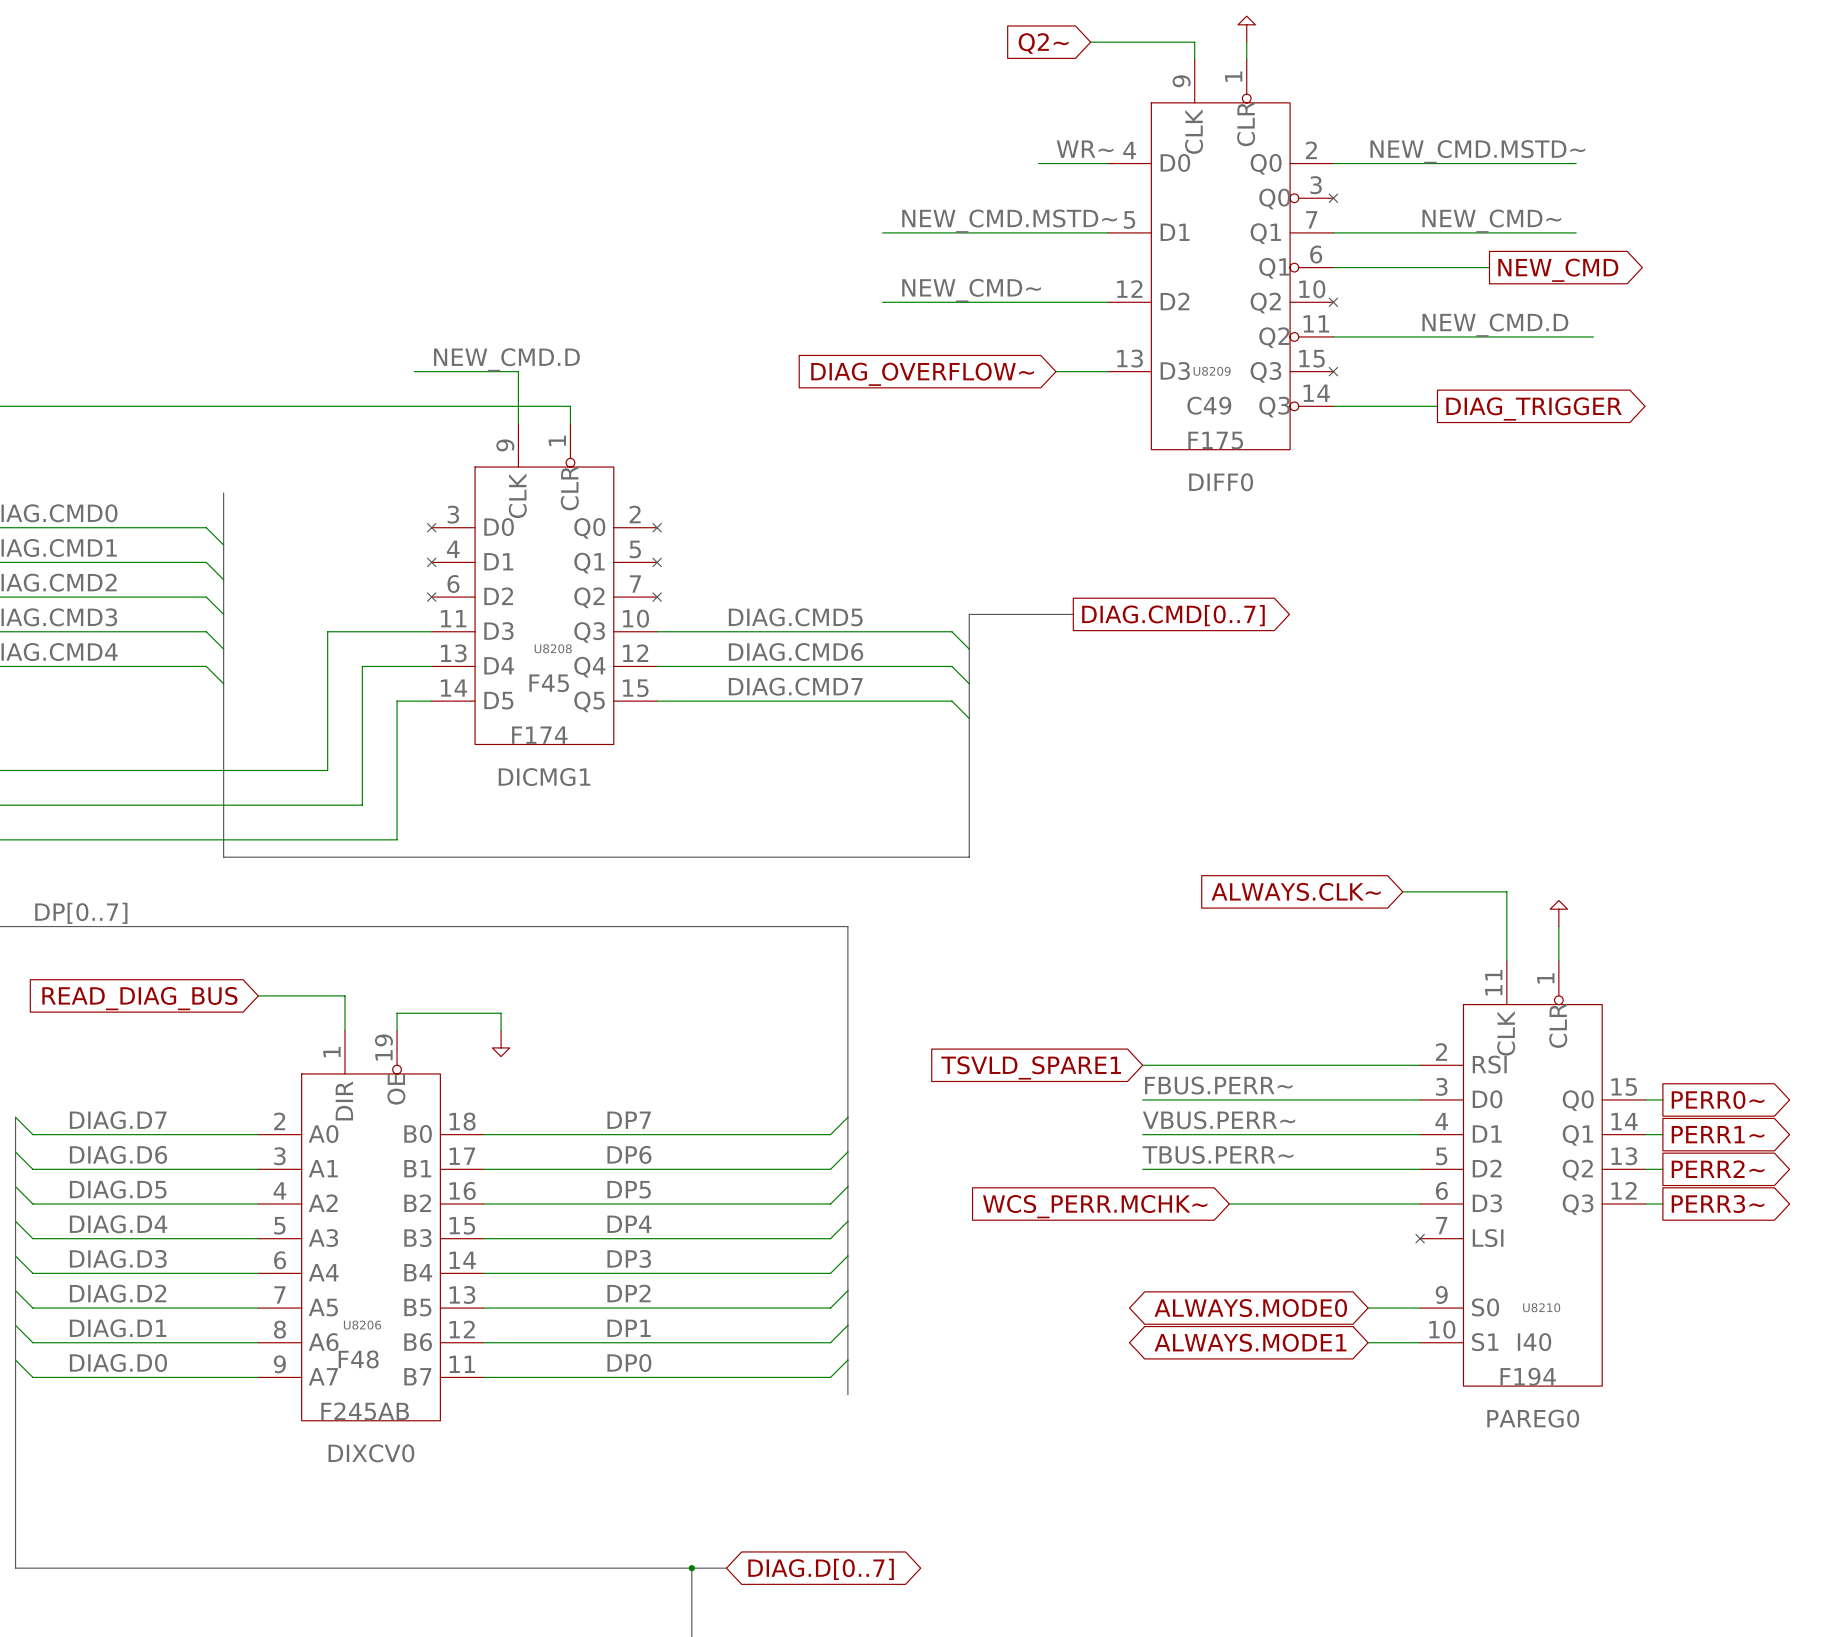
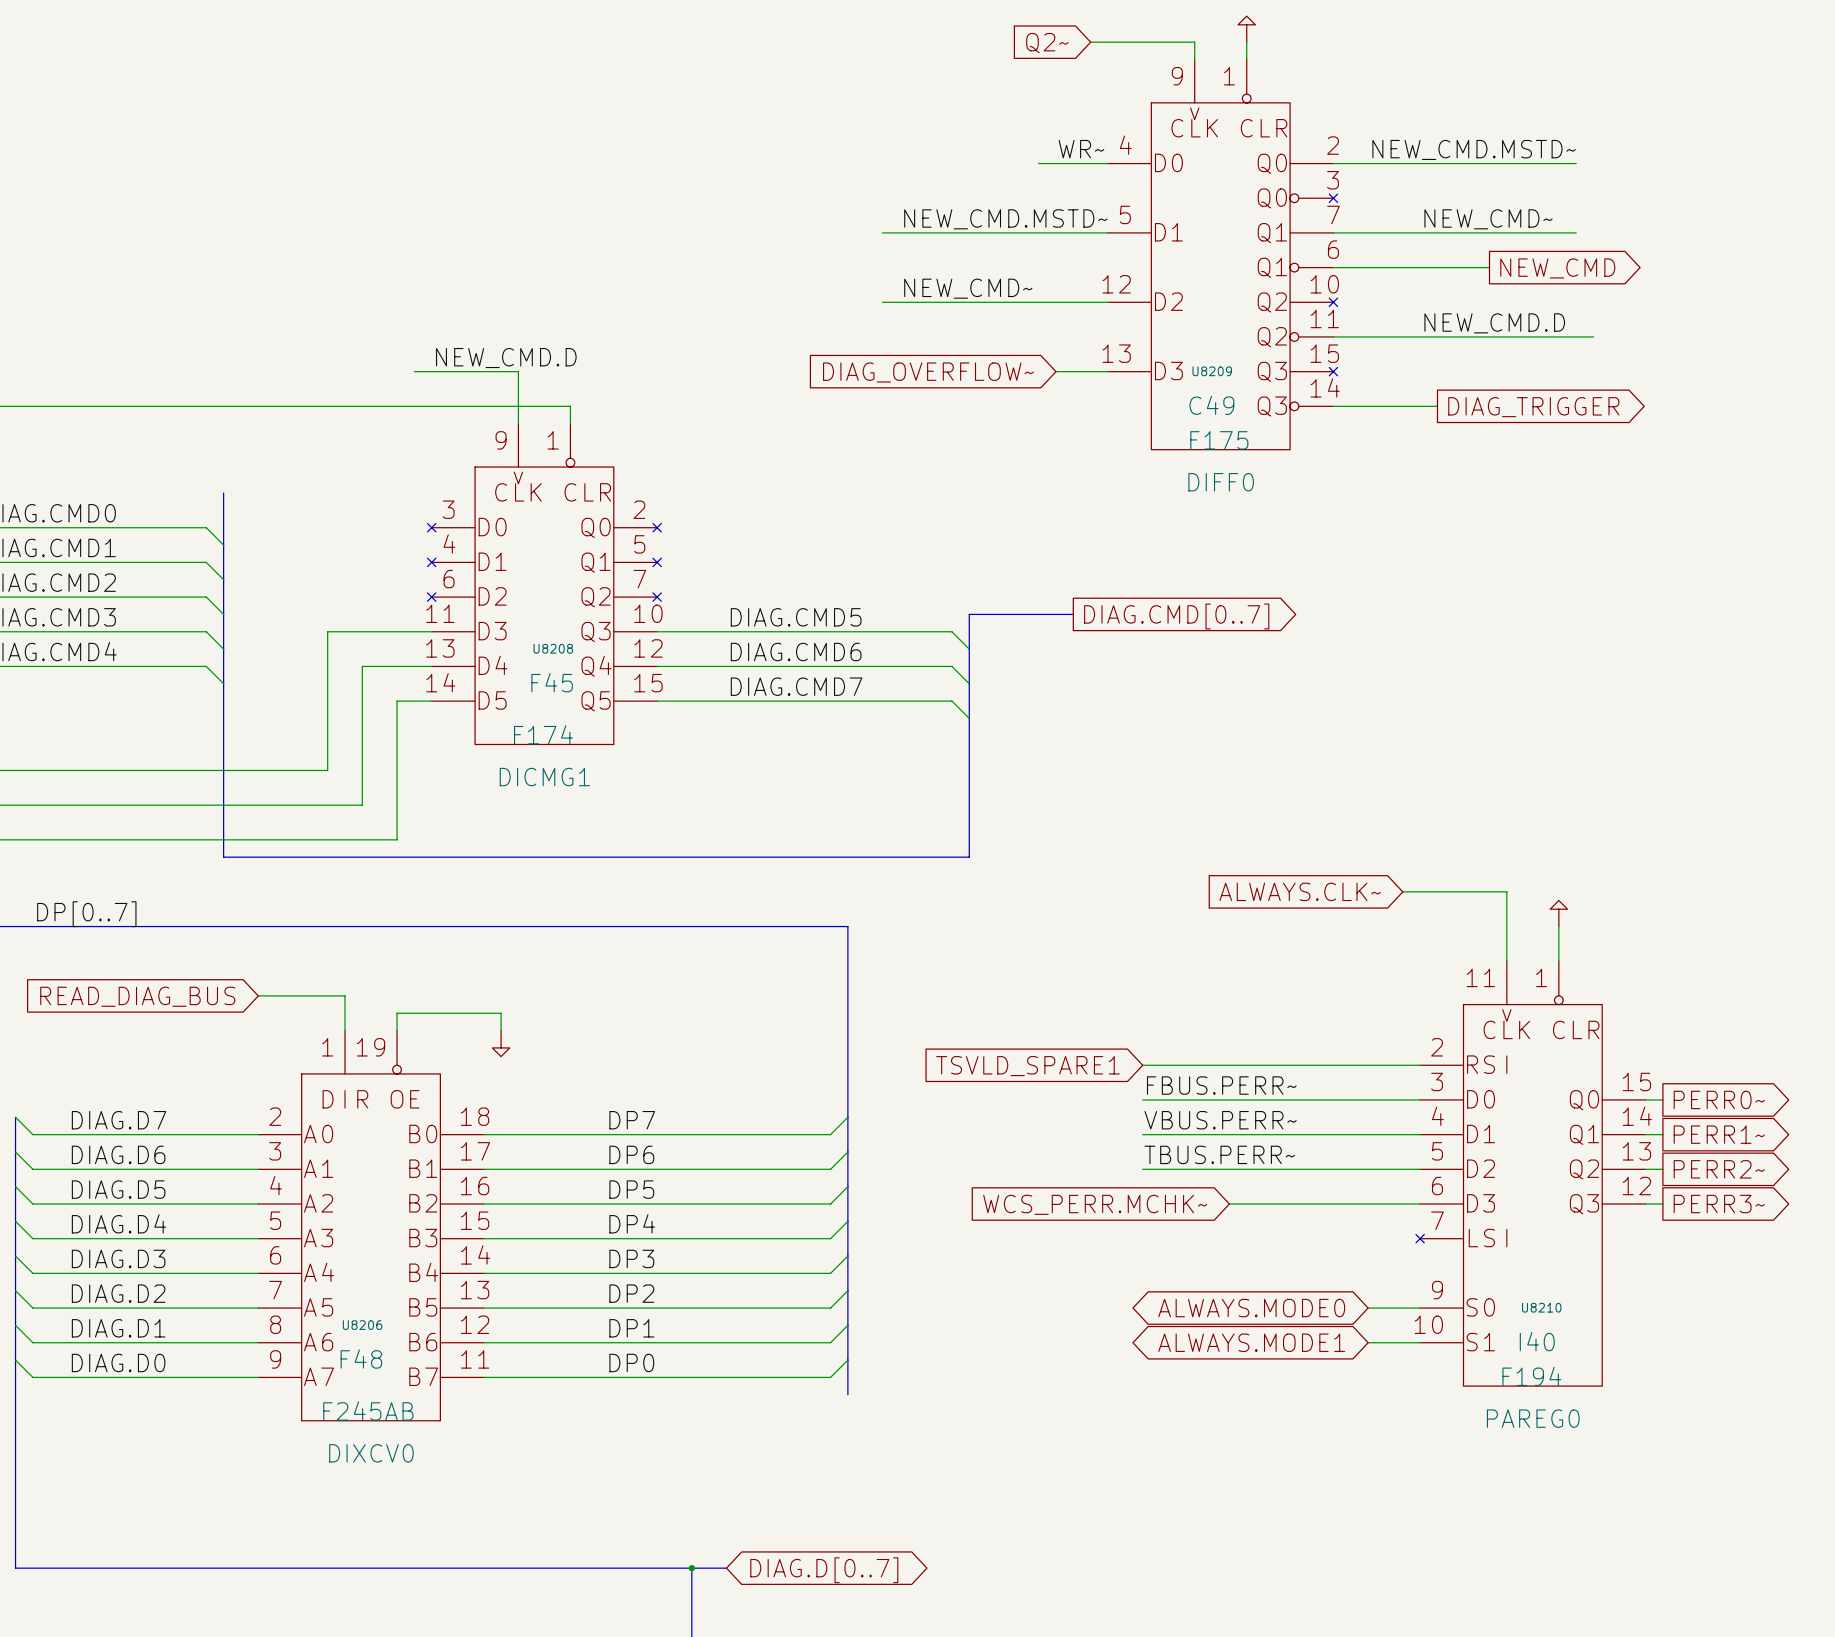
U8209 symbol: [1108, 59, 1334, 450] -> [1108, 59, 1334, 450]
U8208 symbol: [431, 423, 658, 745] -> [431, 423, 658, 745]
U8210 symbol: [1420, 961, 1646, 1387] -> [1420, 961, 1646, 1387]
U8206 symbol: [258, 1030, 484, 1421] -> [258, 1030, 484, 1421]

